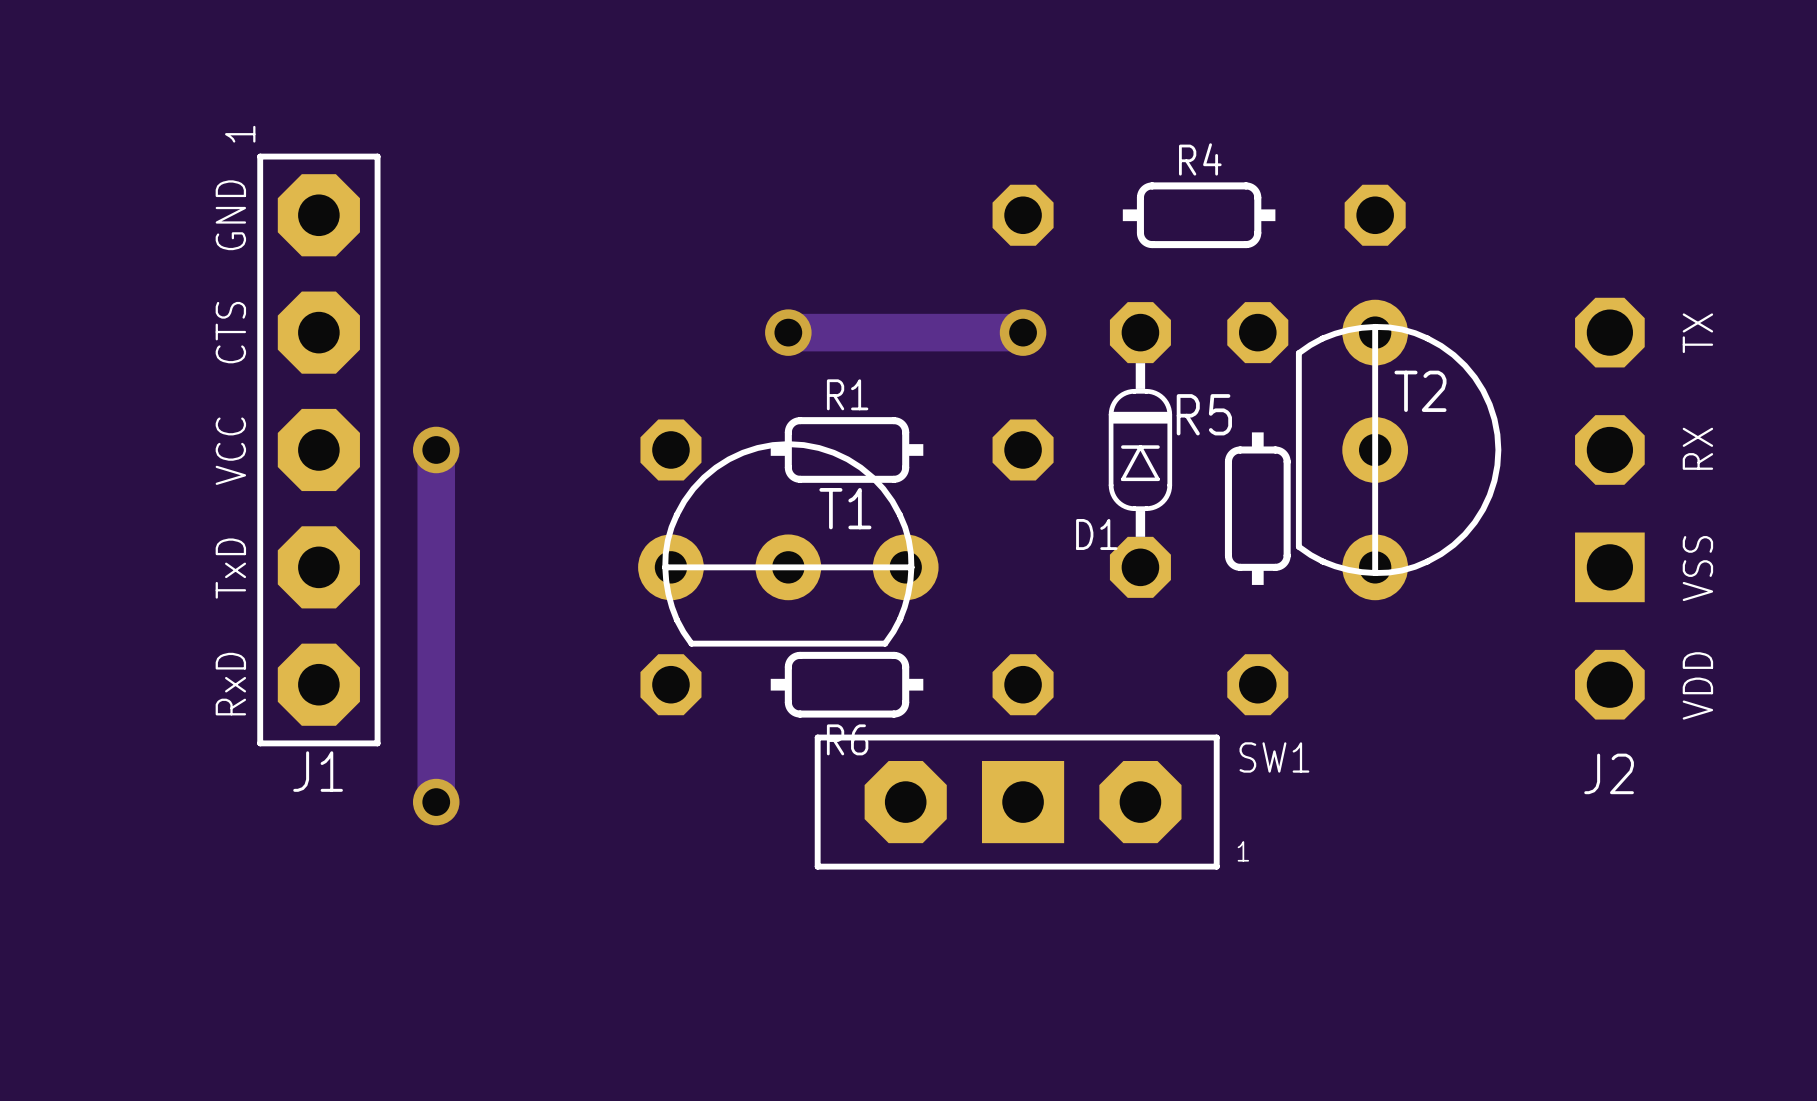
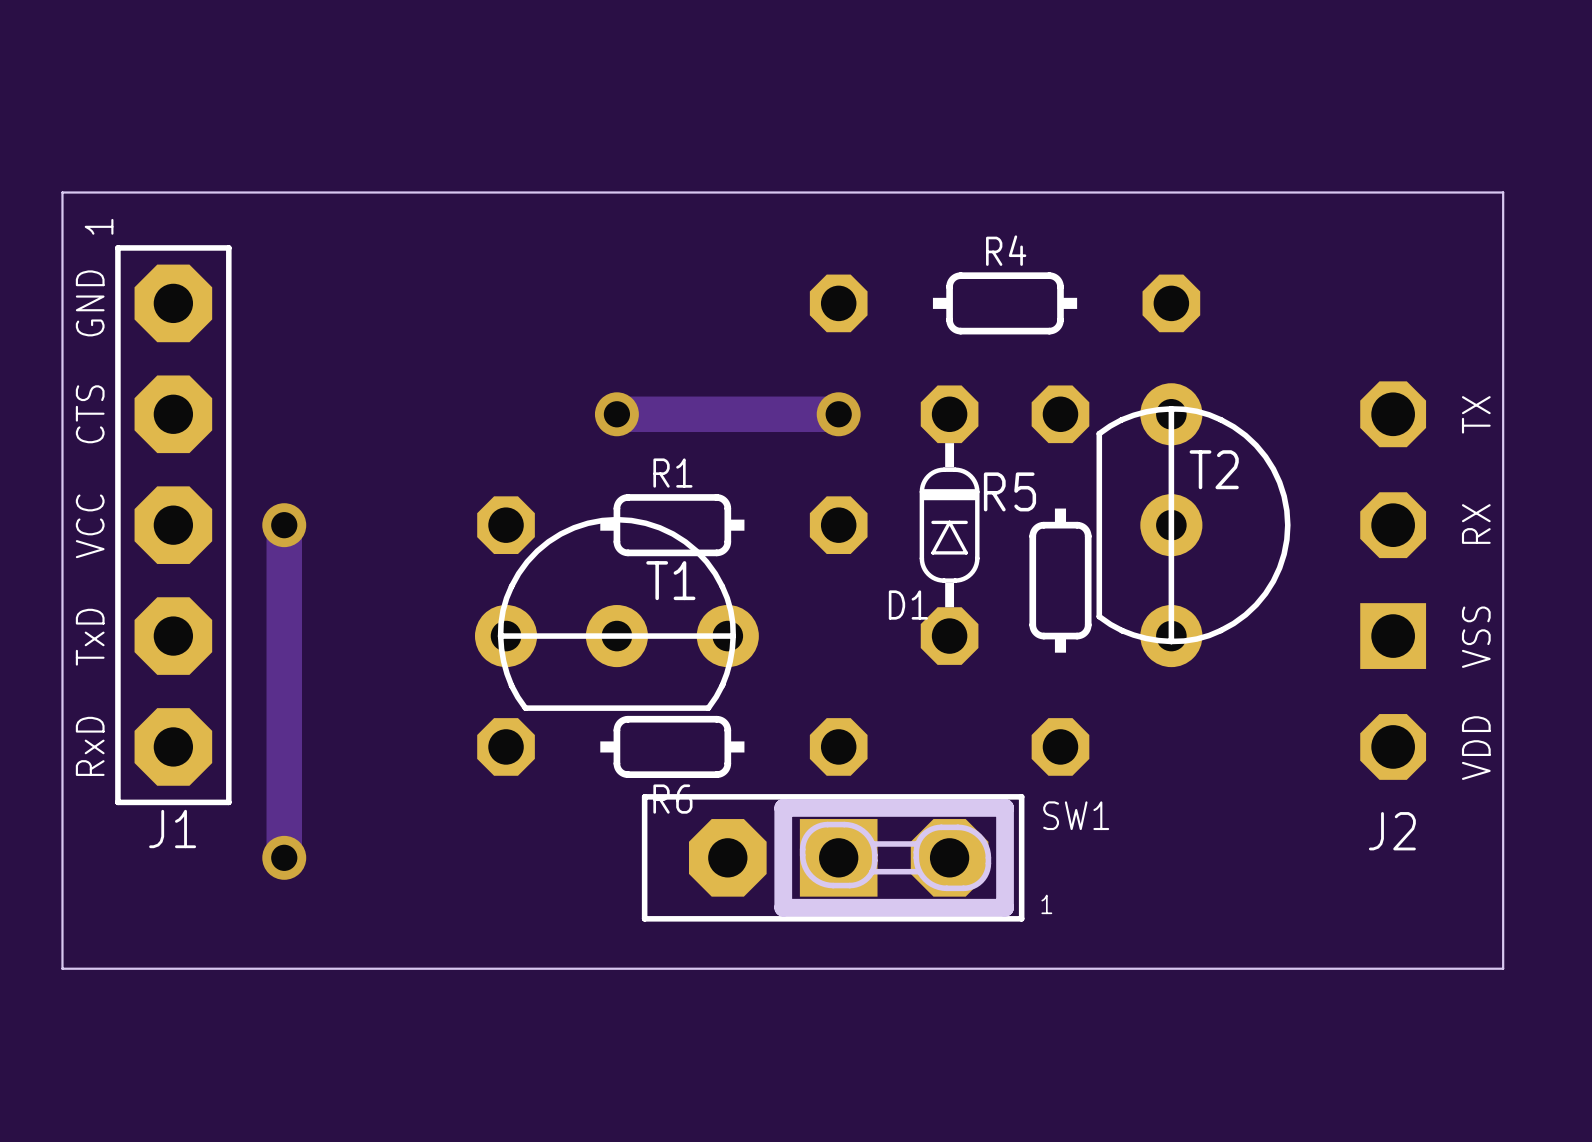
board edge: none -> (62, 192) (1503, 192) (1503, 968) (62, 968) (62, 192)
SW1 footprint: [814, 734, 1220, 870] -> [641, 794, 1025, 922]

